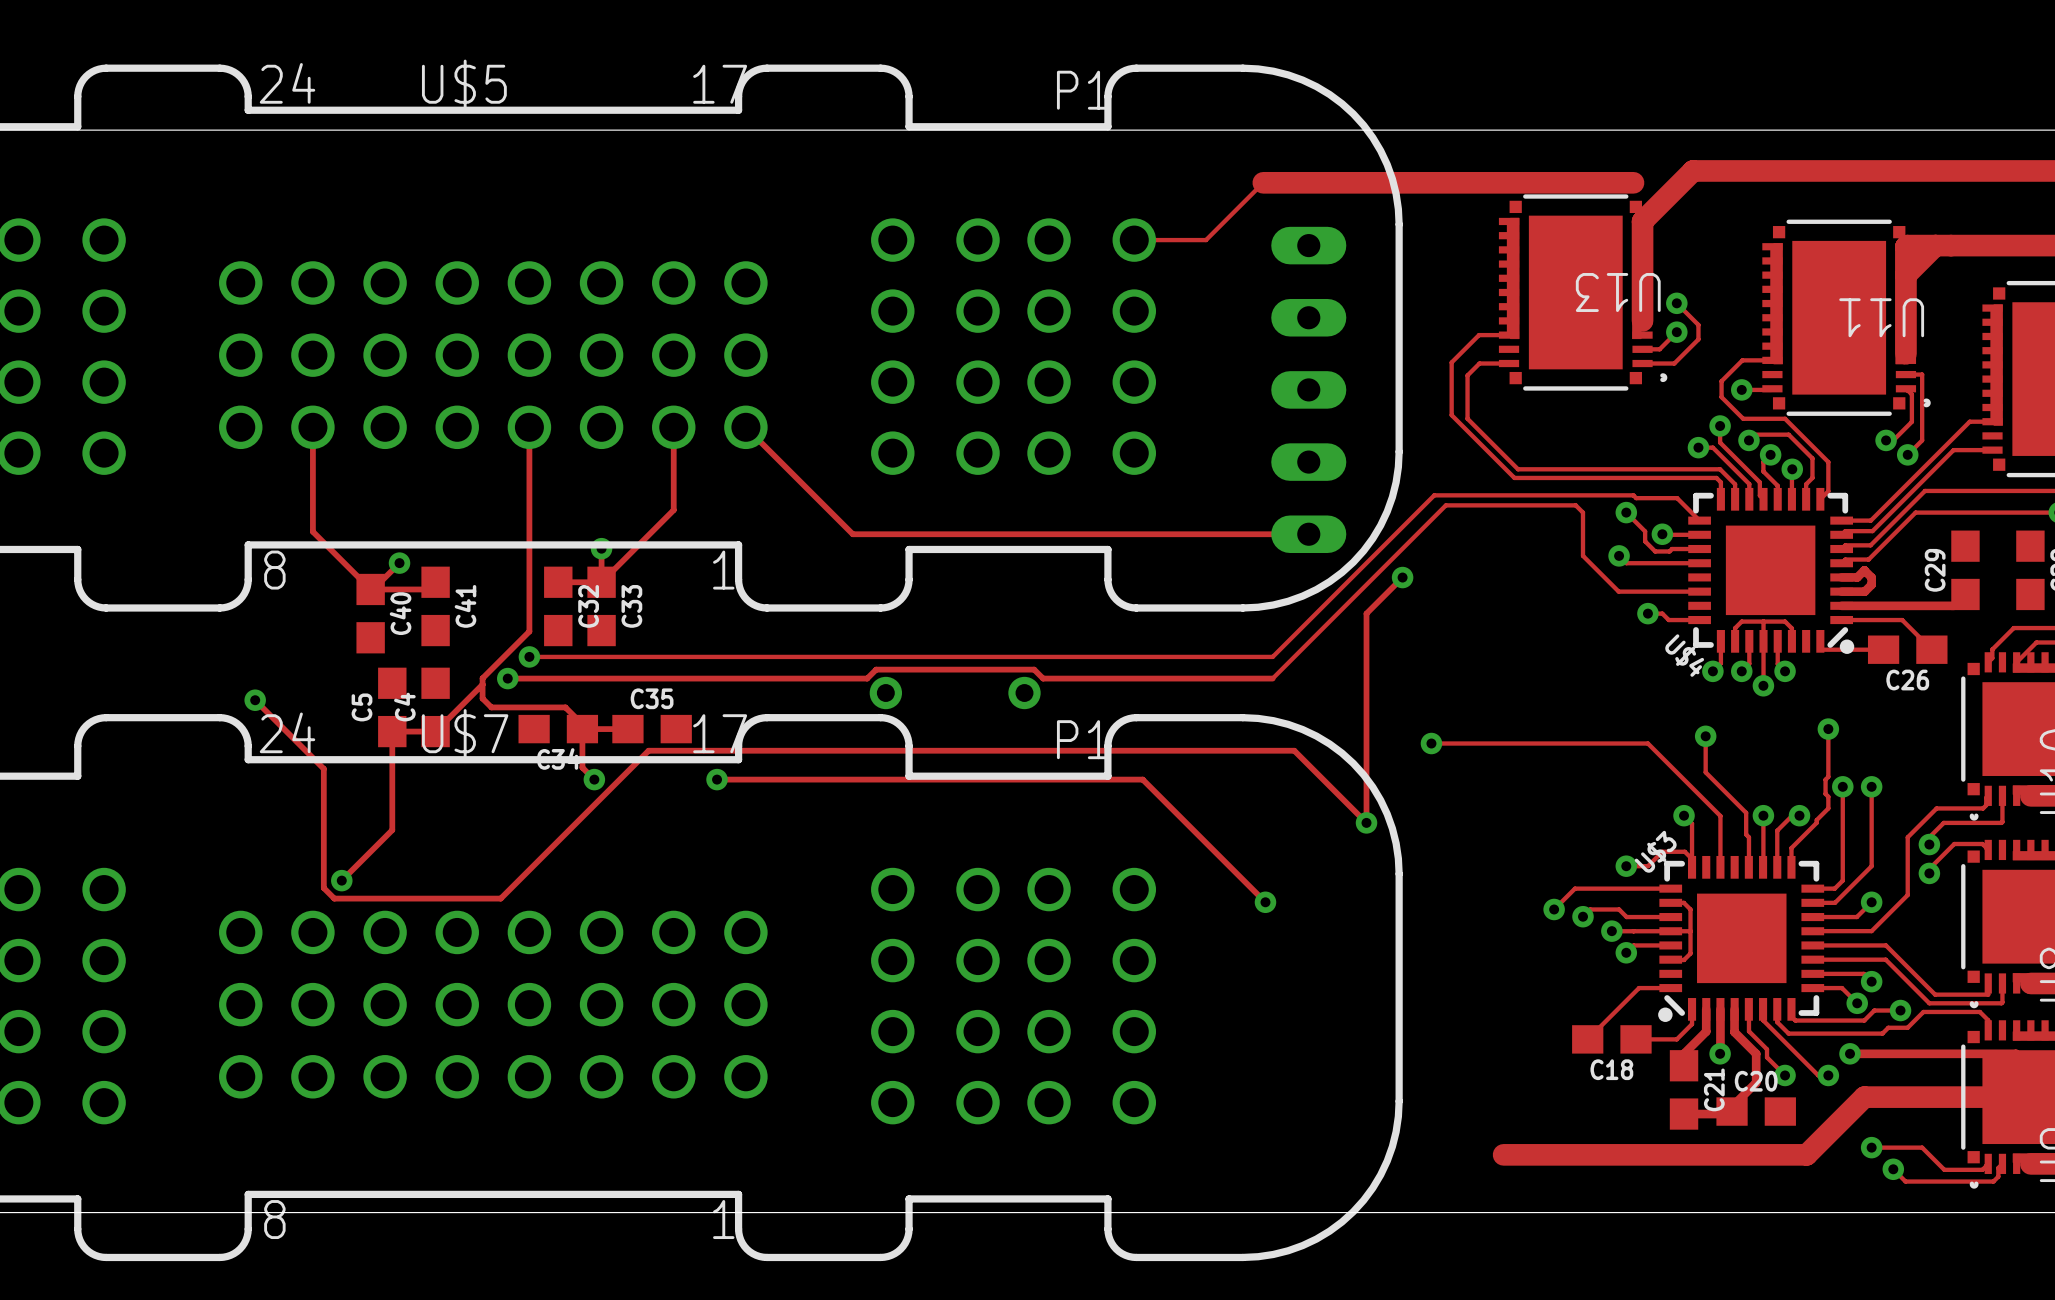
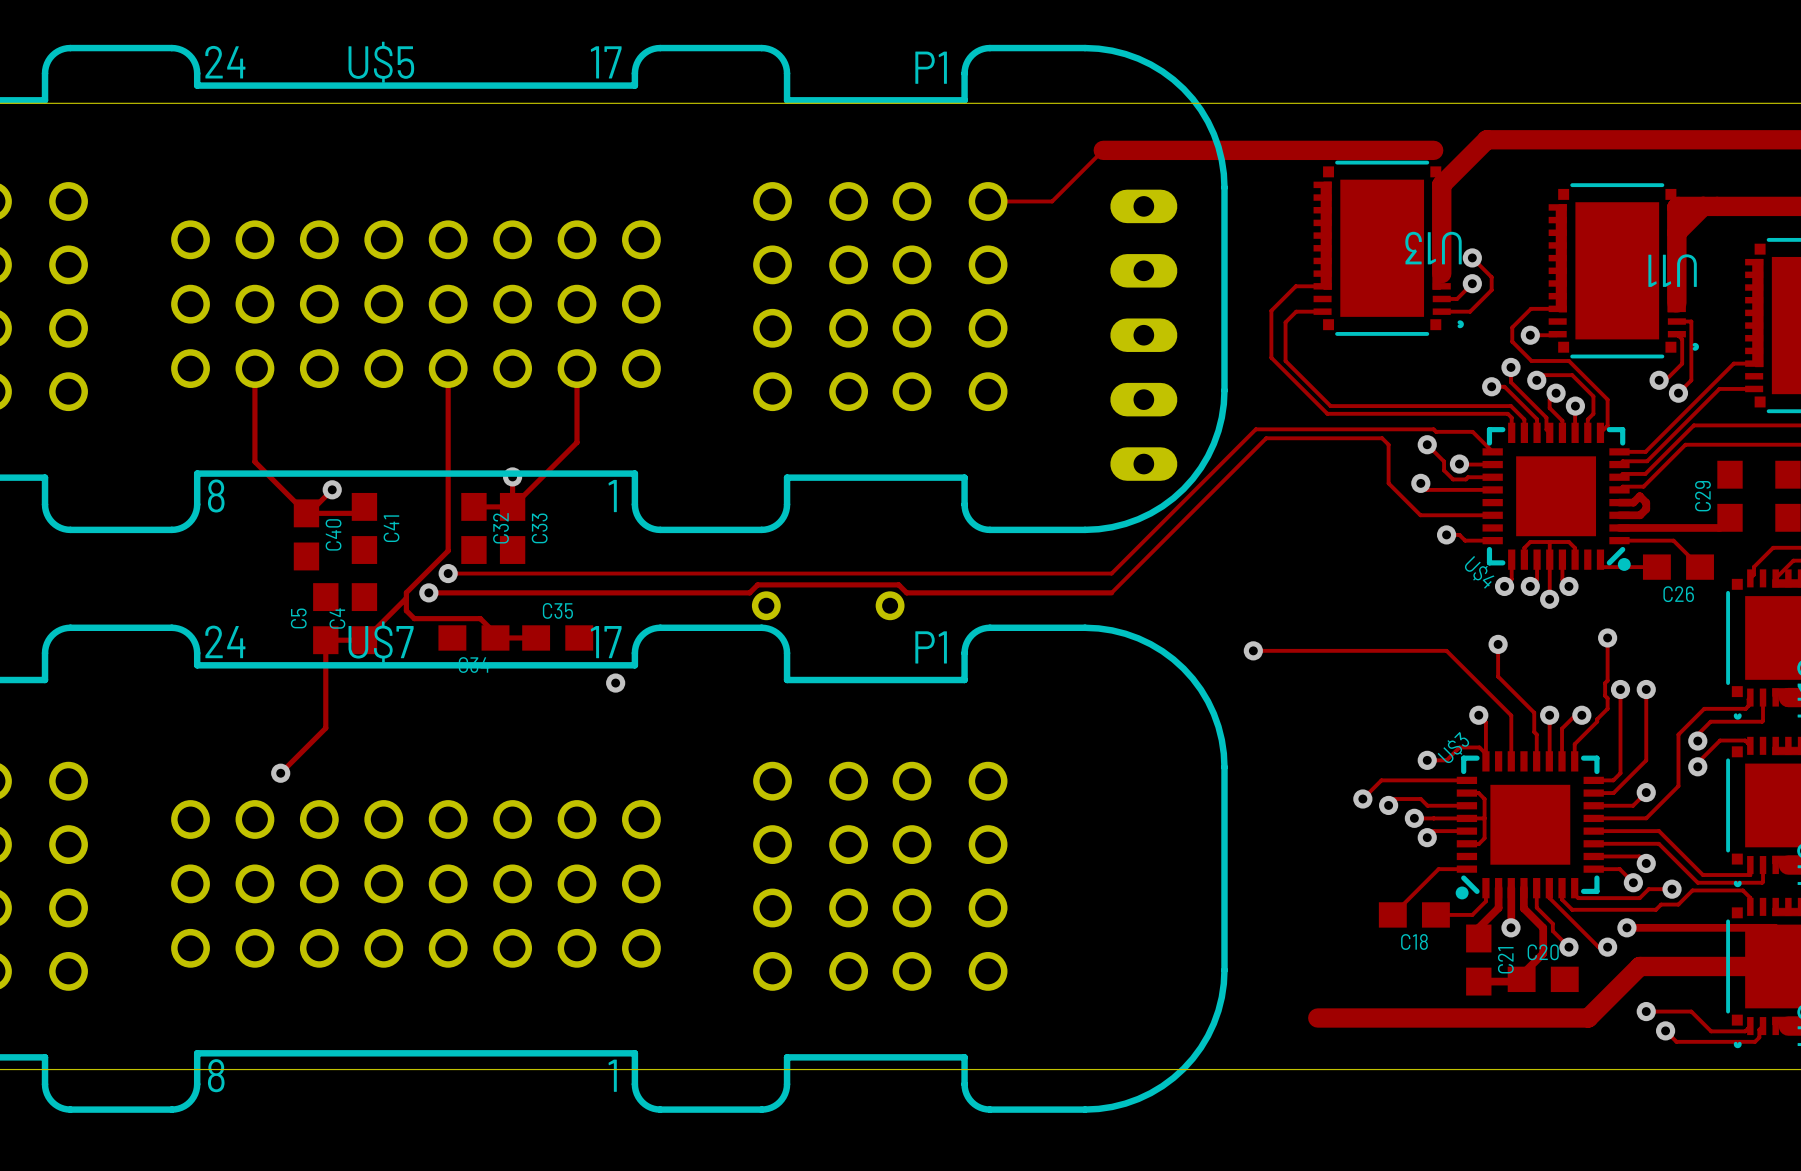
track: (745, 427) (852, 534) (1308, 534) -> none
track: (1402, 577) (1366, 613) (1366, 822) (1294, 750) (648, 750) (500, 898) (334, 898) (323, 888) (323, 768) (255, 700) -> none
via: (1402, 577) -> none
via: (255, 700) -> none
track: (582, 729) (582, 767) (594, 779) -> none
via: (594, 779) -> none
track: (717, 779) (1142, 779) (1265, 902) -> none
via: (1366, 822) -> none
via: (1265, 902) -> none

